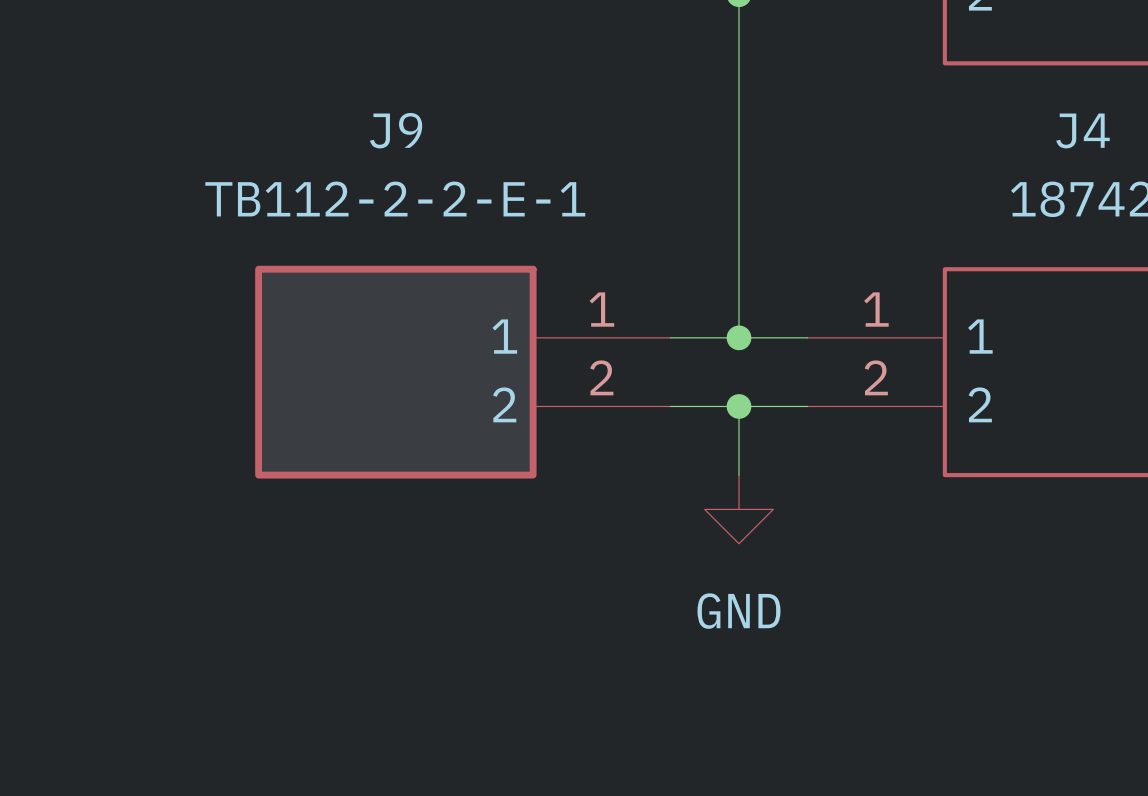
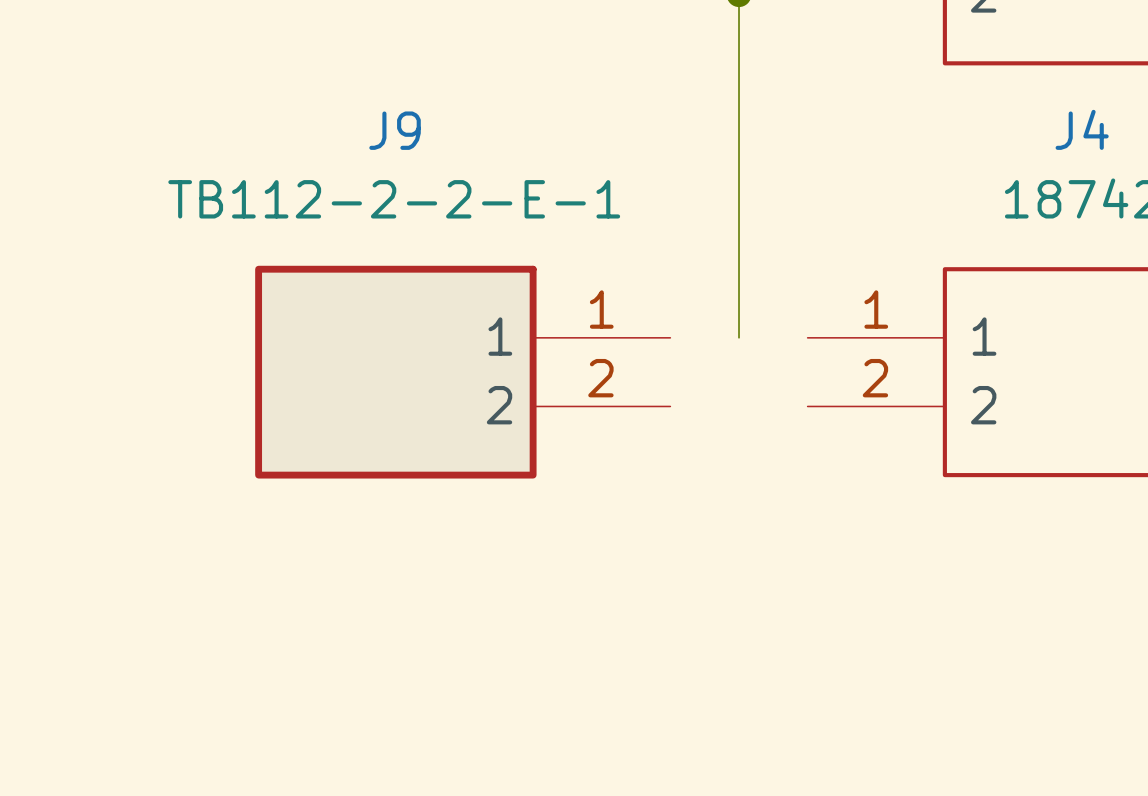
wire: (670, 337) (807, 337) -> none
junction: (739, 337) -> none
wire: (670, 406) (807, 406) -> none
wire: (739, 406) (739, 475) -> none
junction: (739, 406) -> none
power symbol: GND (739, 509) -> none

